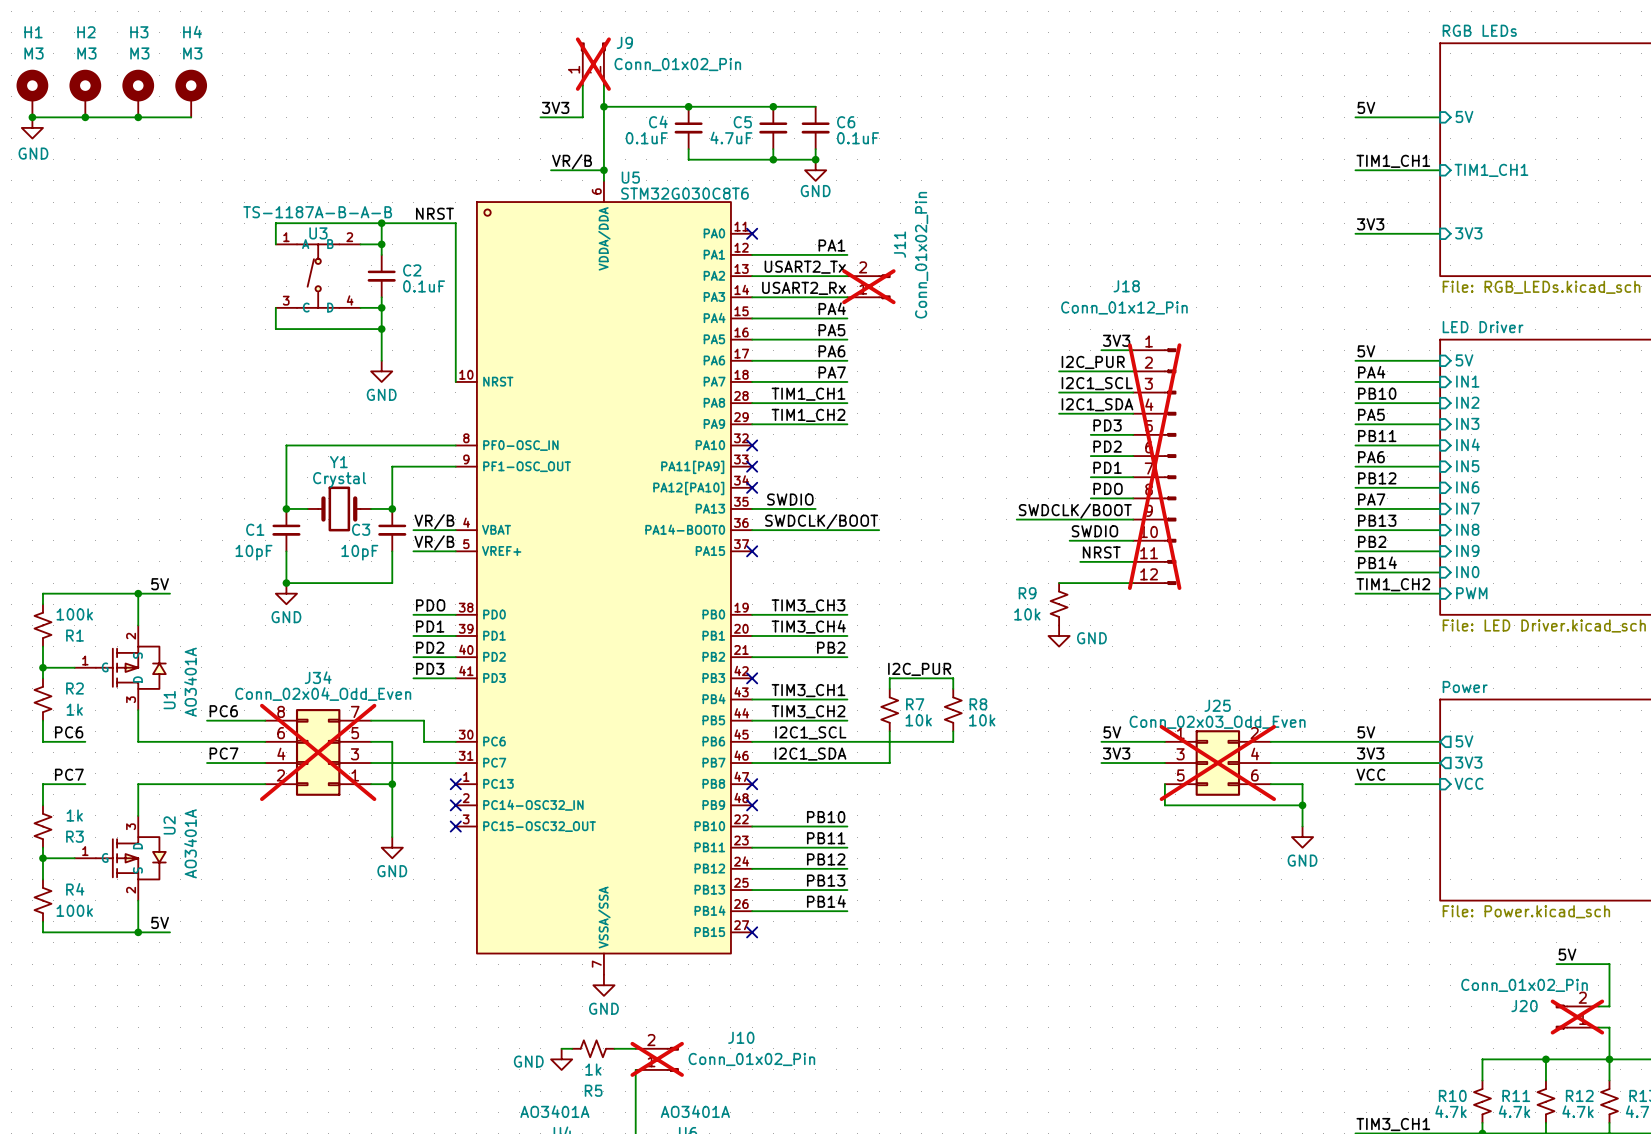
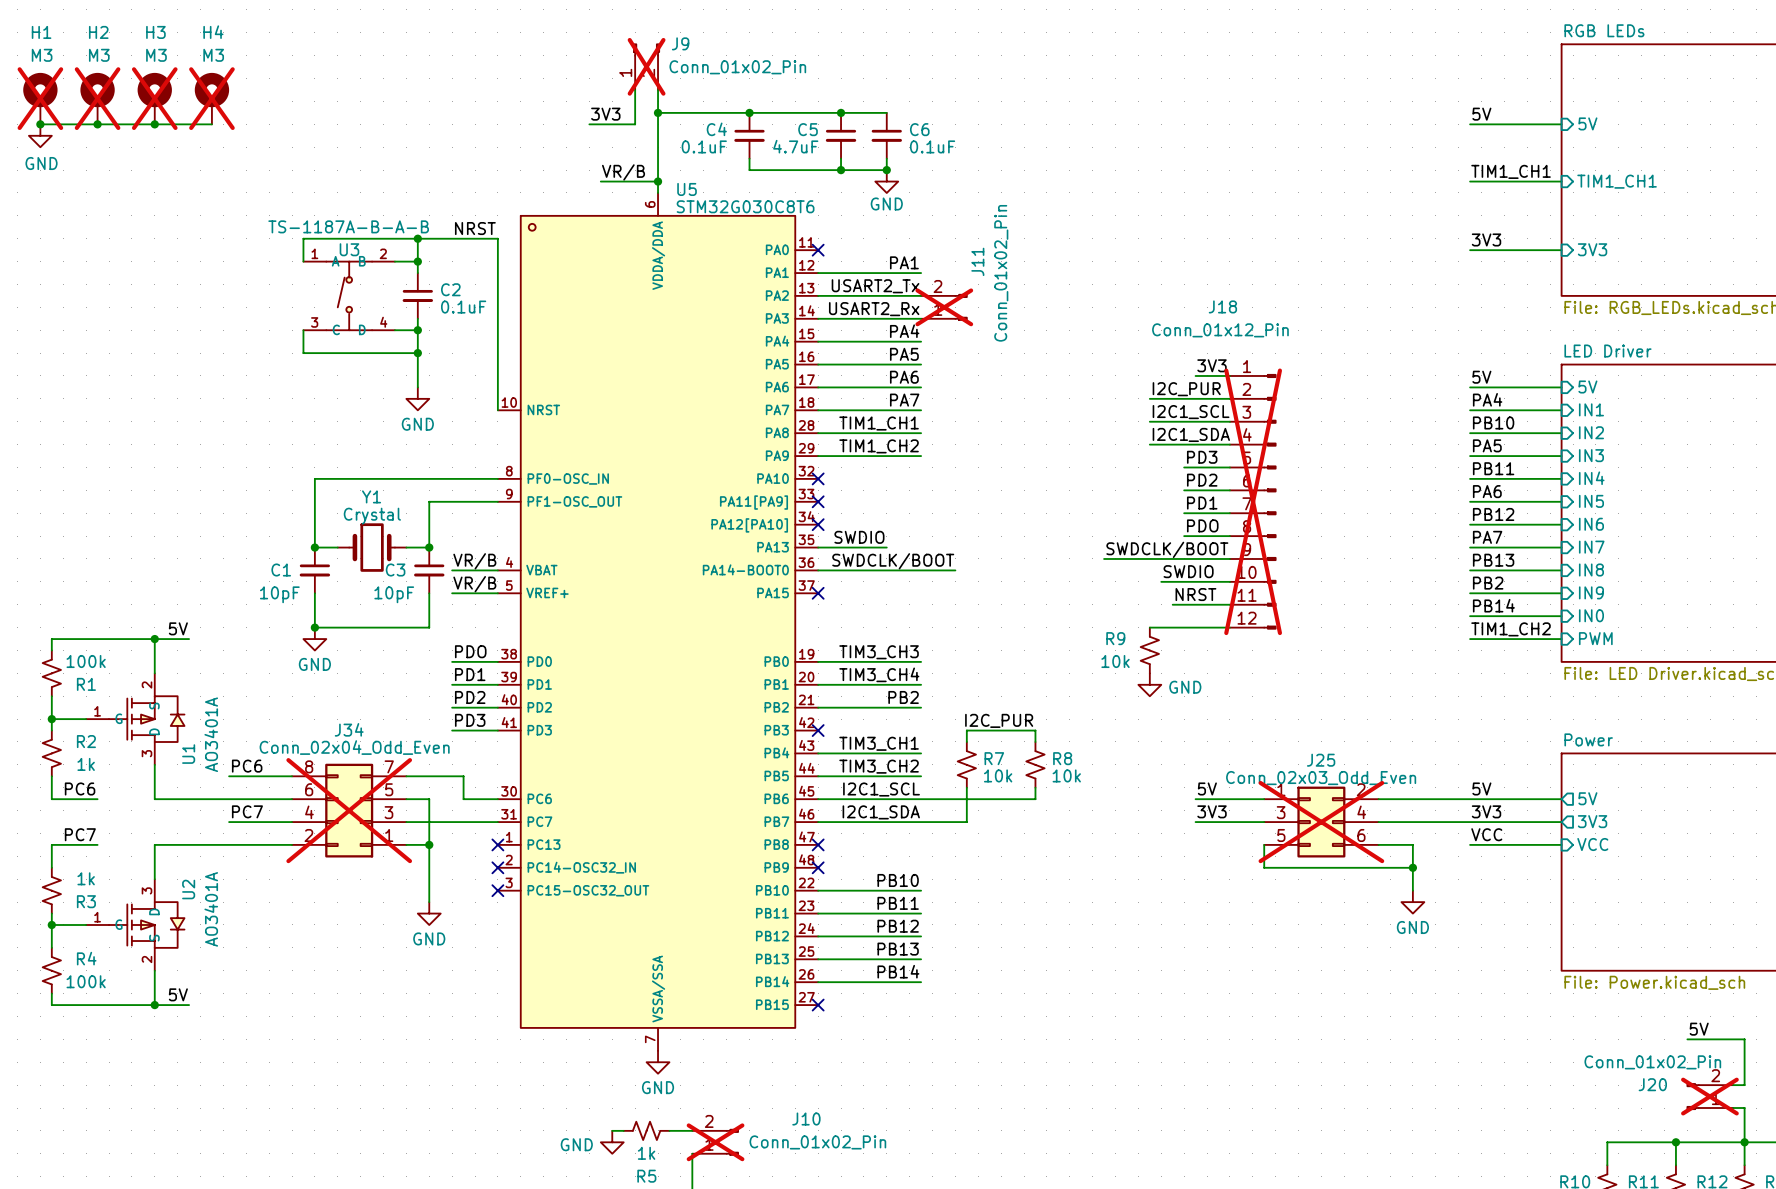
H1 do-not-place cross: none -> (40, 98)
H2 do-not-place cross: none -> (97, 98)
H3 do-not-place cross: none -> (154, 98)
H4 do-not-place cross: none -> (211, 98)

